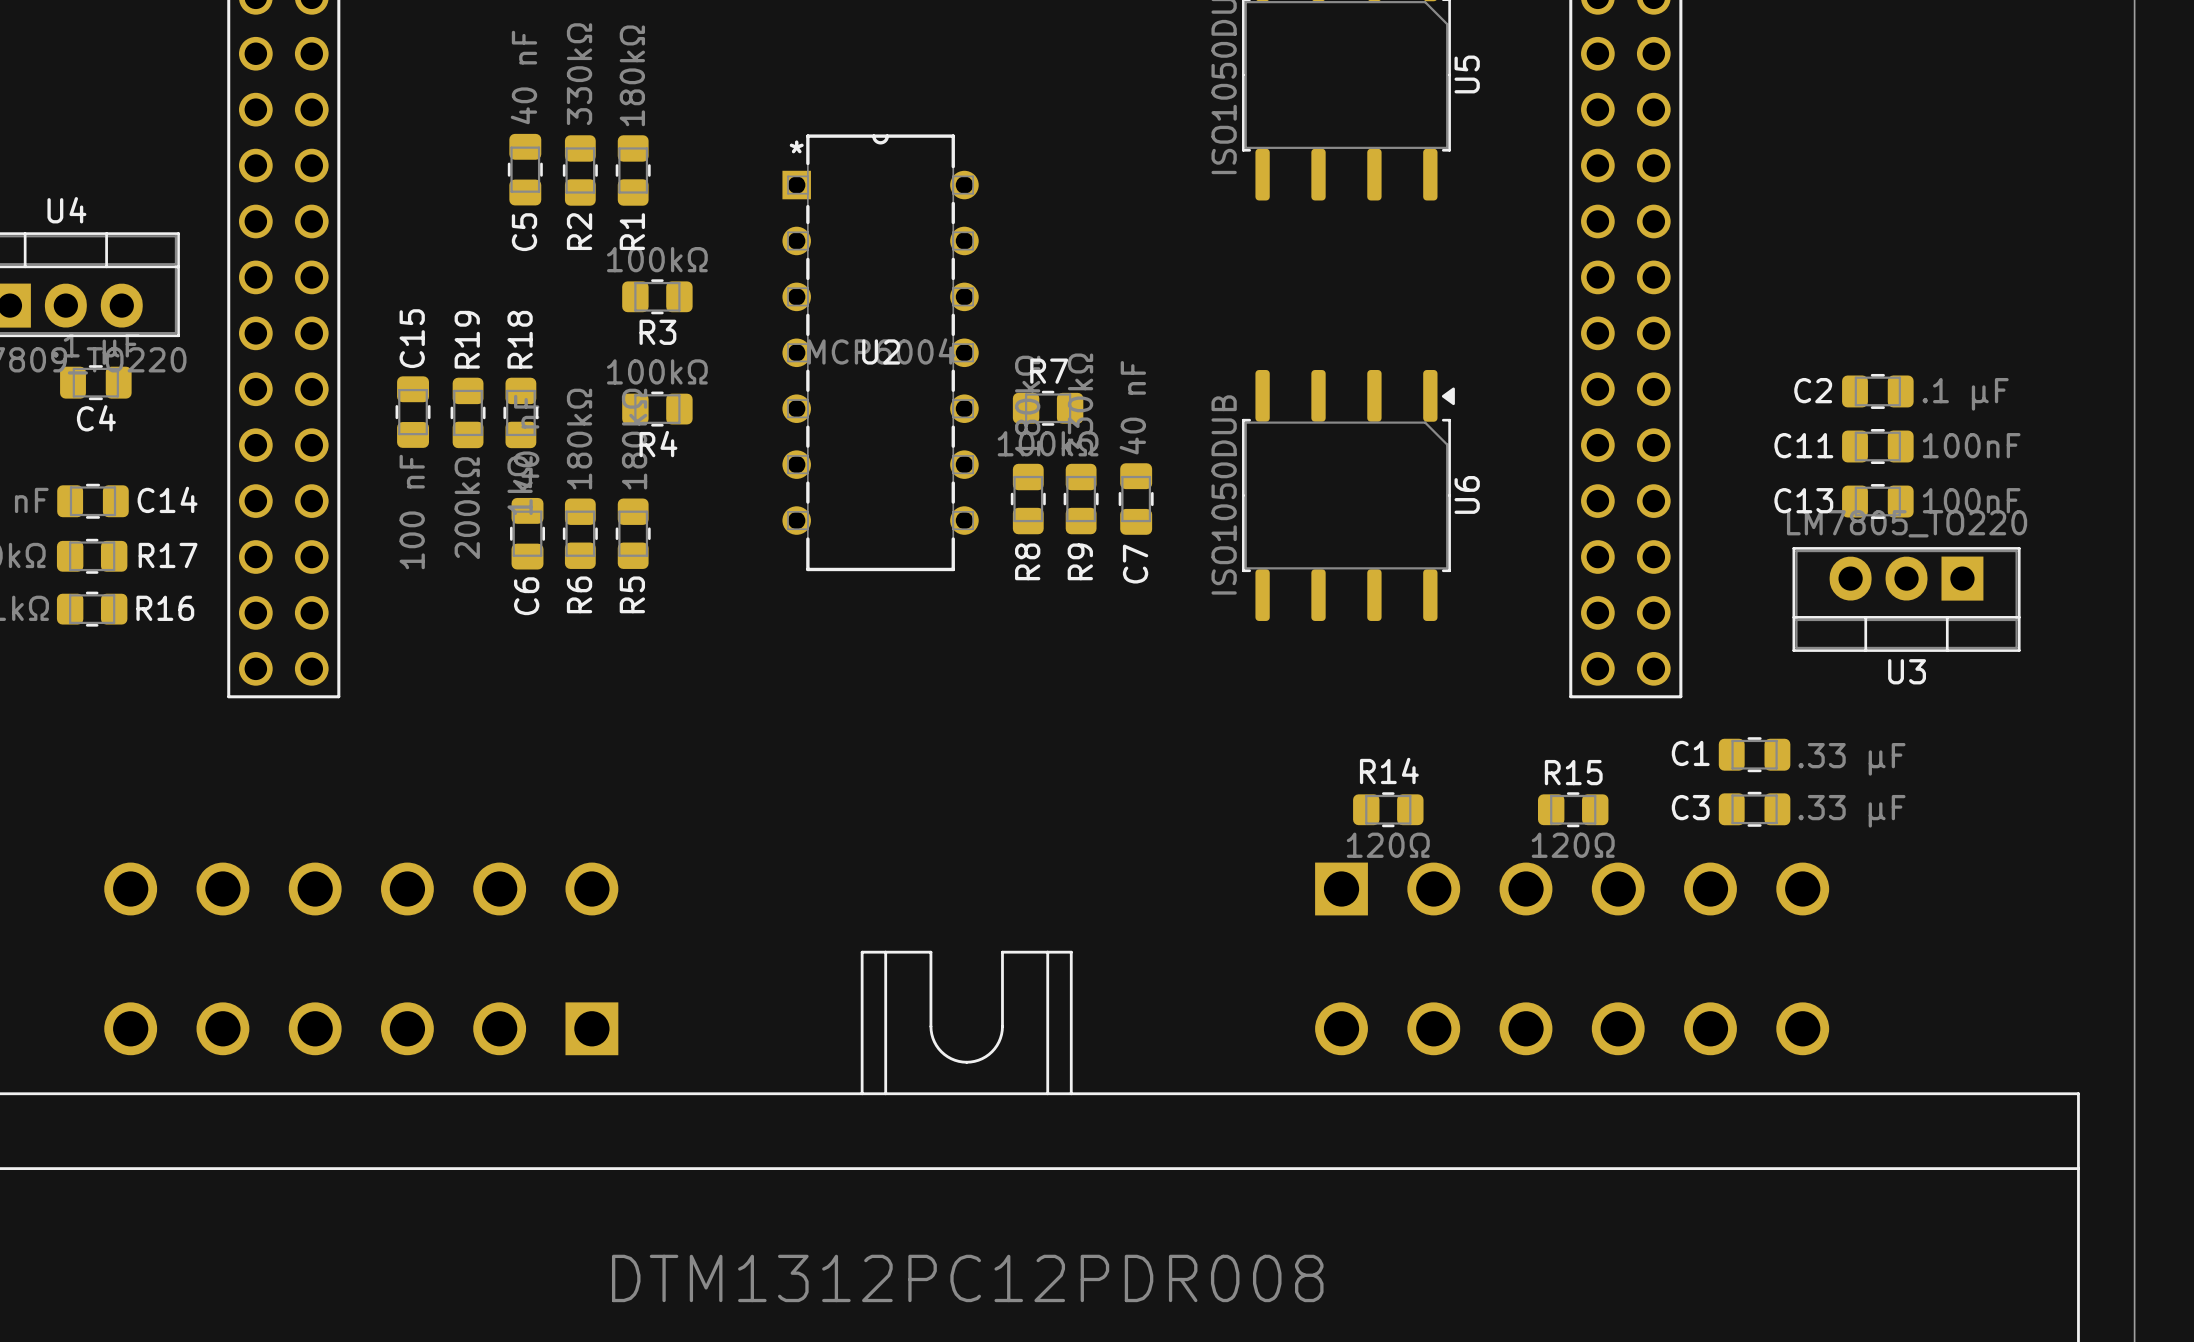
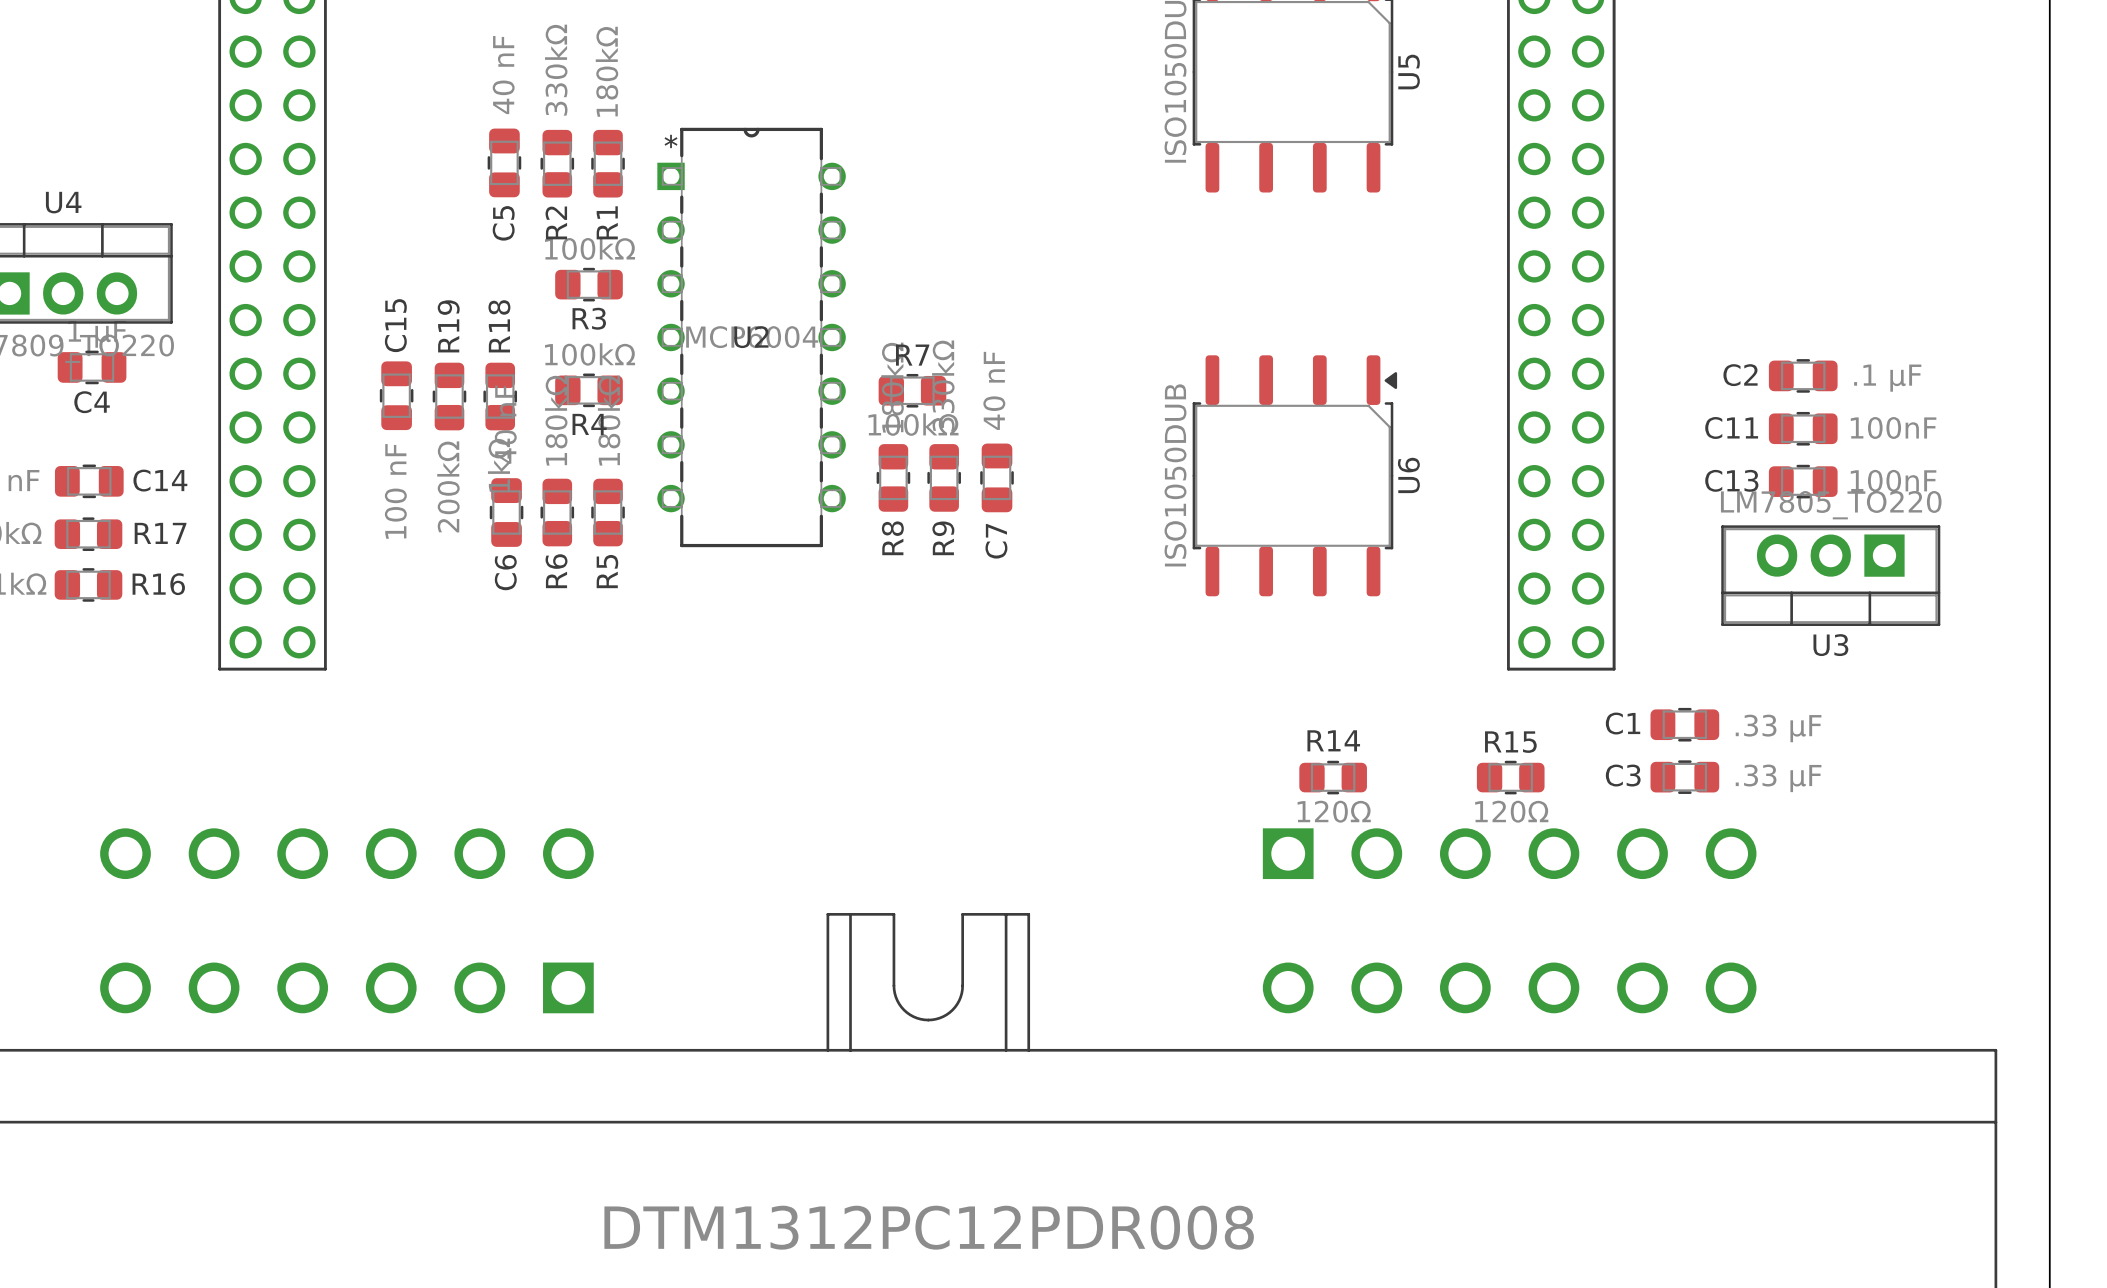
R3 position: (657, 296) -> (589, 284)
U2 position: (880, 352) -> (751, 337)
R7 position: (1048, 408) -> (912, 390)
R4 position: (657, 409) -> (589, 390)
R8 position: (1028, 499) -> (893, 477)
R9 position: (1081, 499) -> (944, 477)
C7 position: (1136, 499) -> (997, 477)

